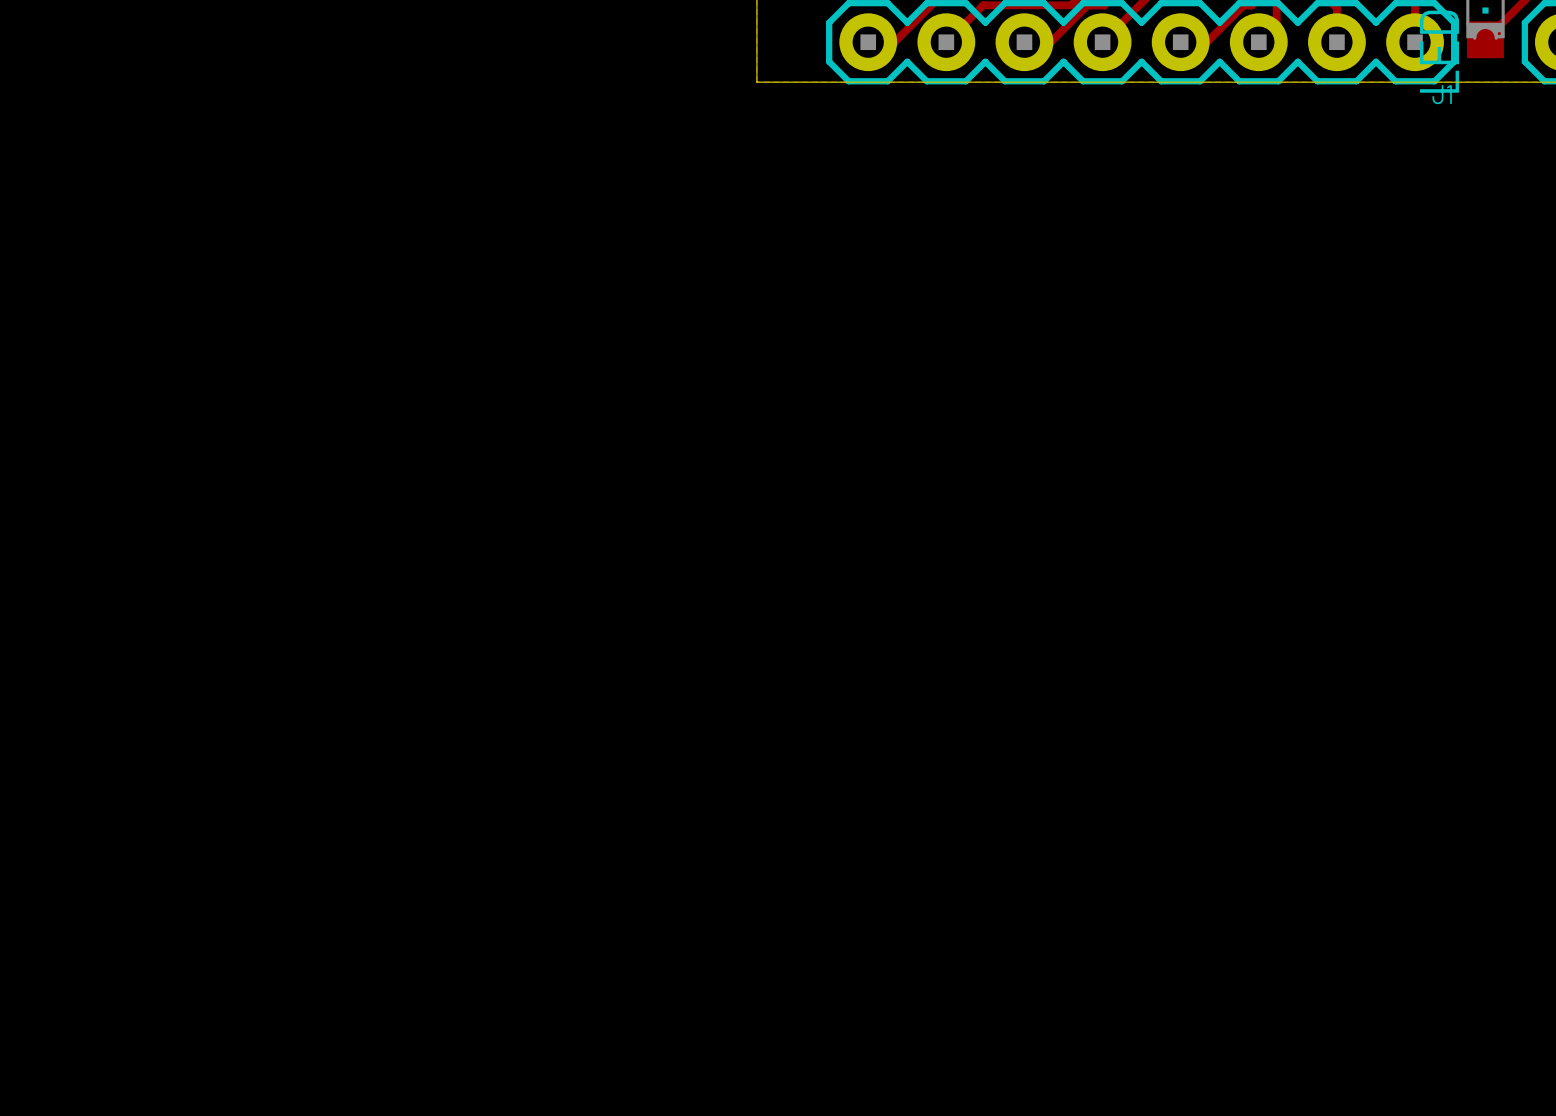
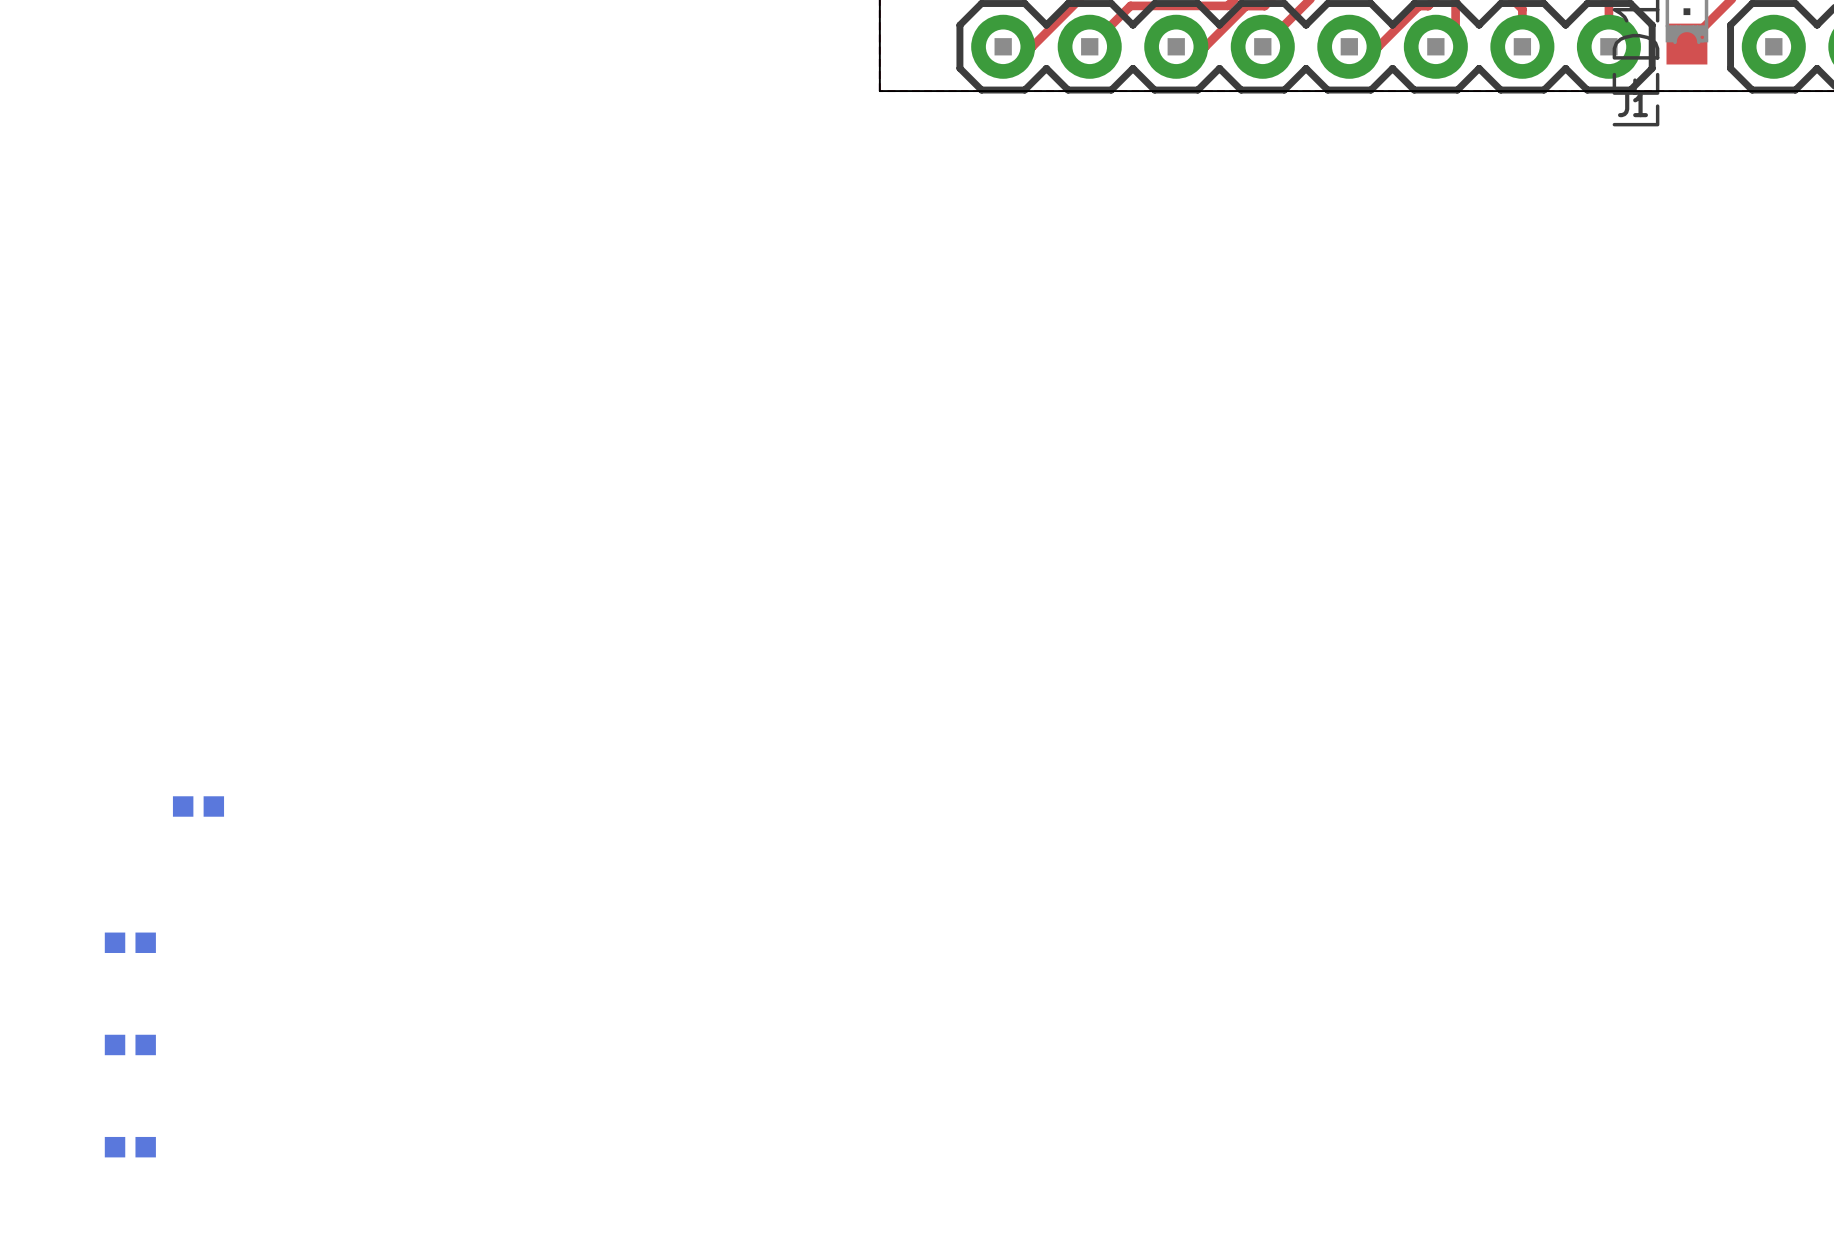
part: none -> (198, 806)
part: none -> (130, 942)
part: none -> (130, 1044)
part: none -> (130, 1147)

